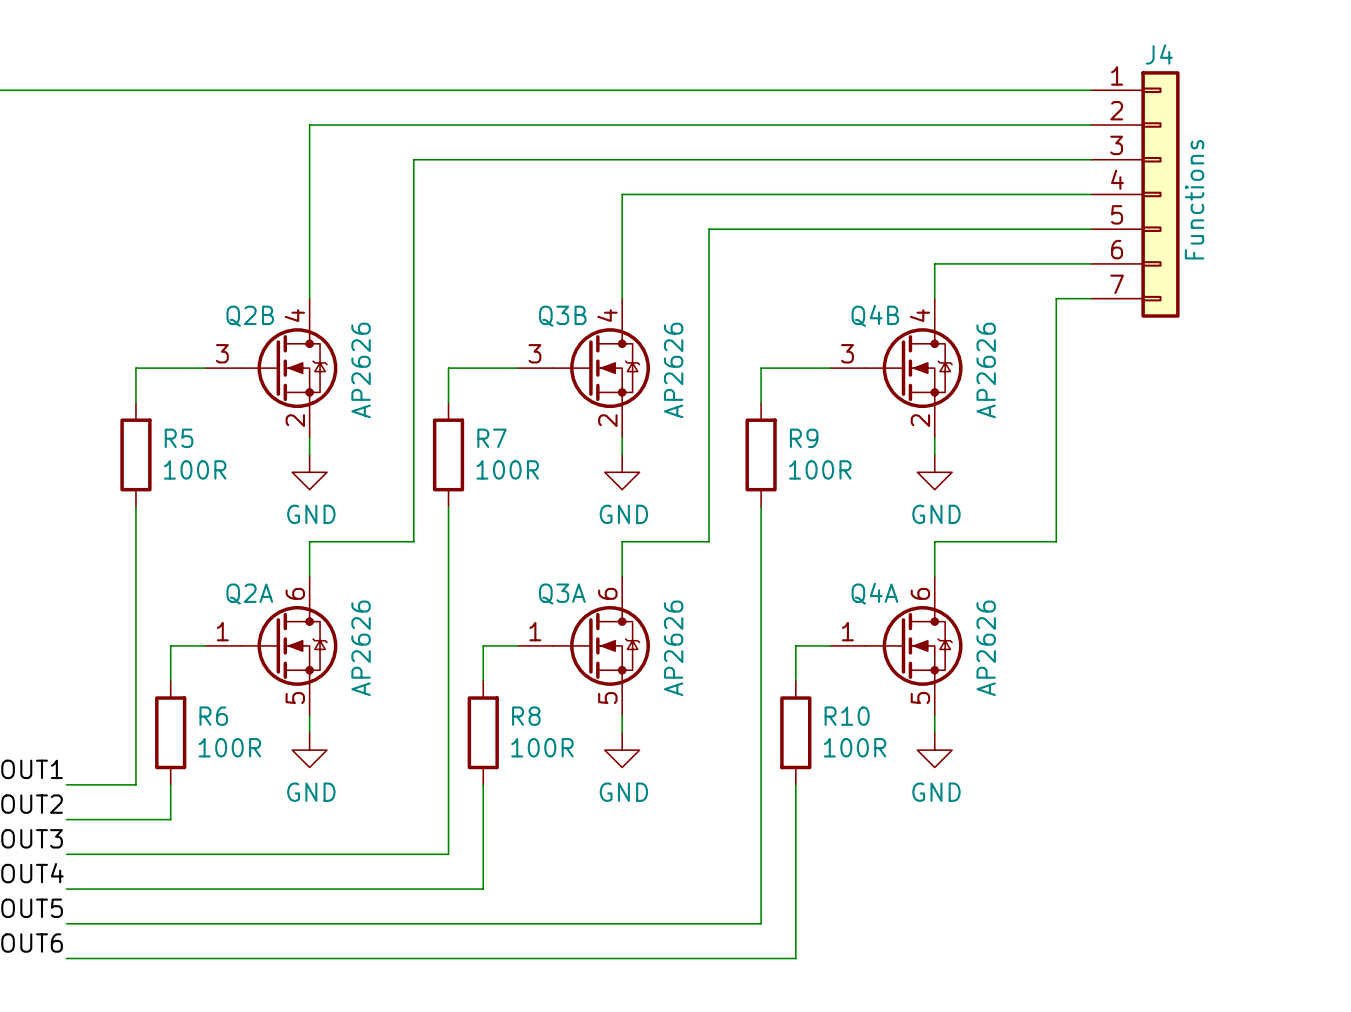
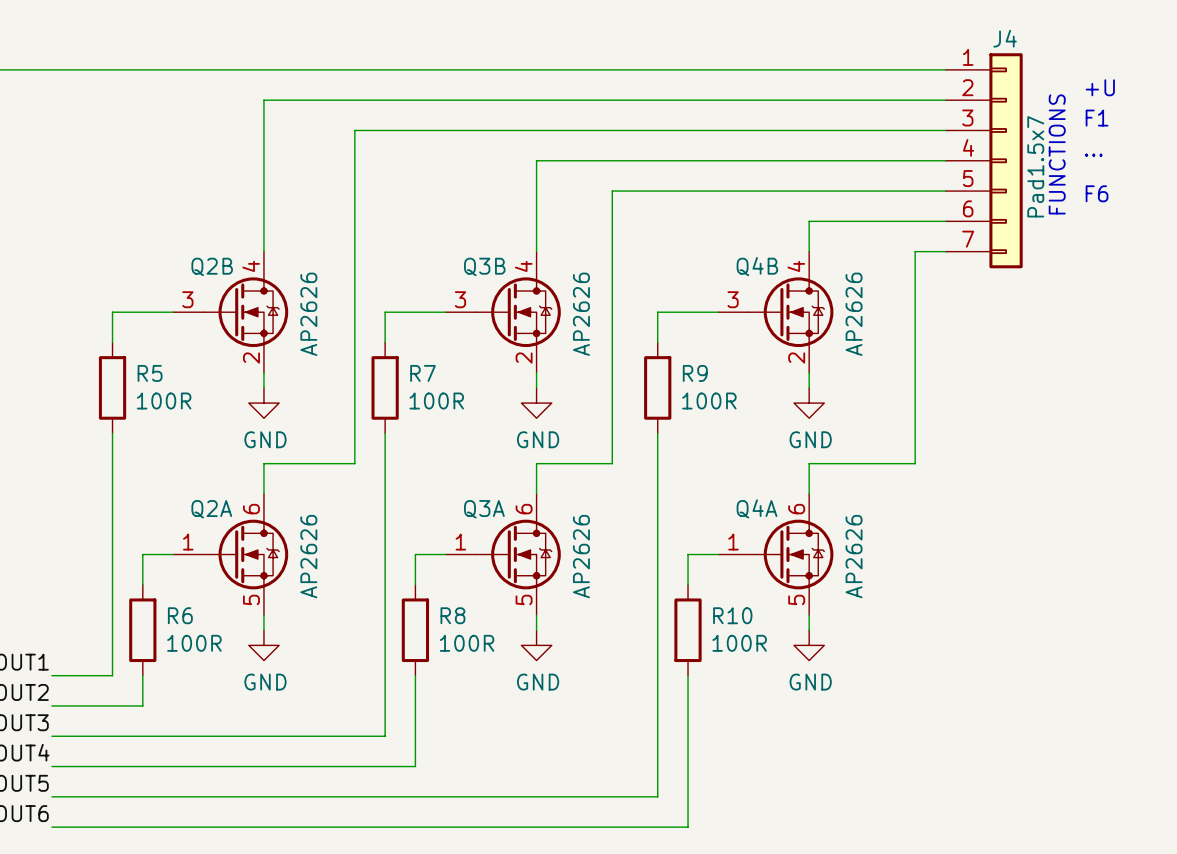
text: none -> +U (1100, 87)
text: none -> F1 (1097, 118)
text: none -> FUNCTIONS (1057, 154)
text: none -> ... (1093, 155)
J4 value: Functions (1194, 199) -> Pad1.5x7 (1035, 166)
text: none -> F6 (1097, 193)

